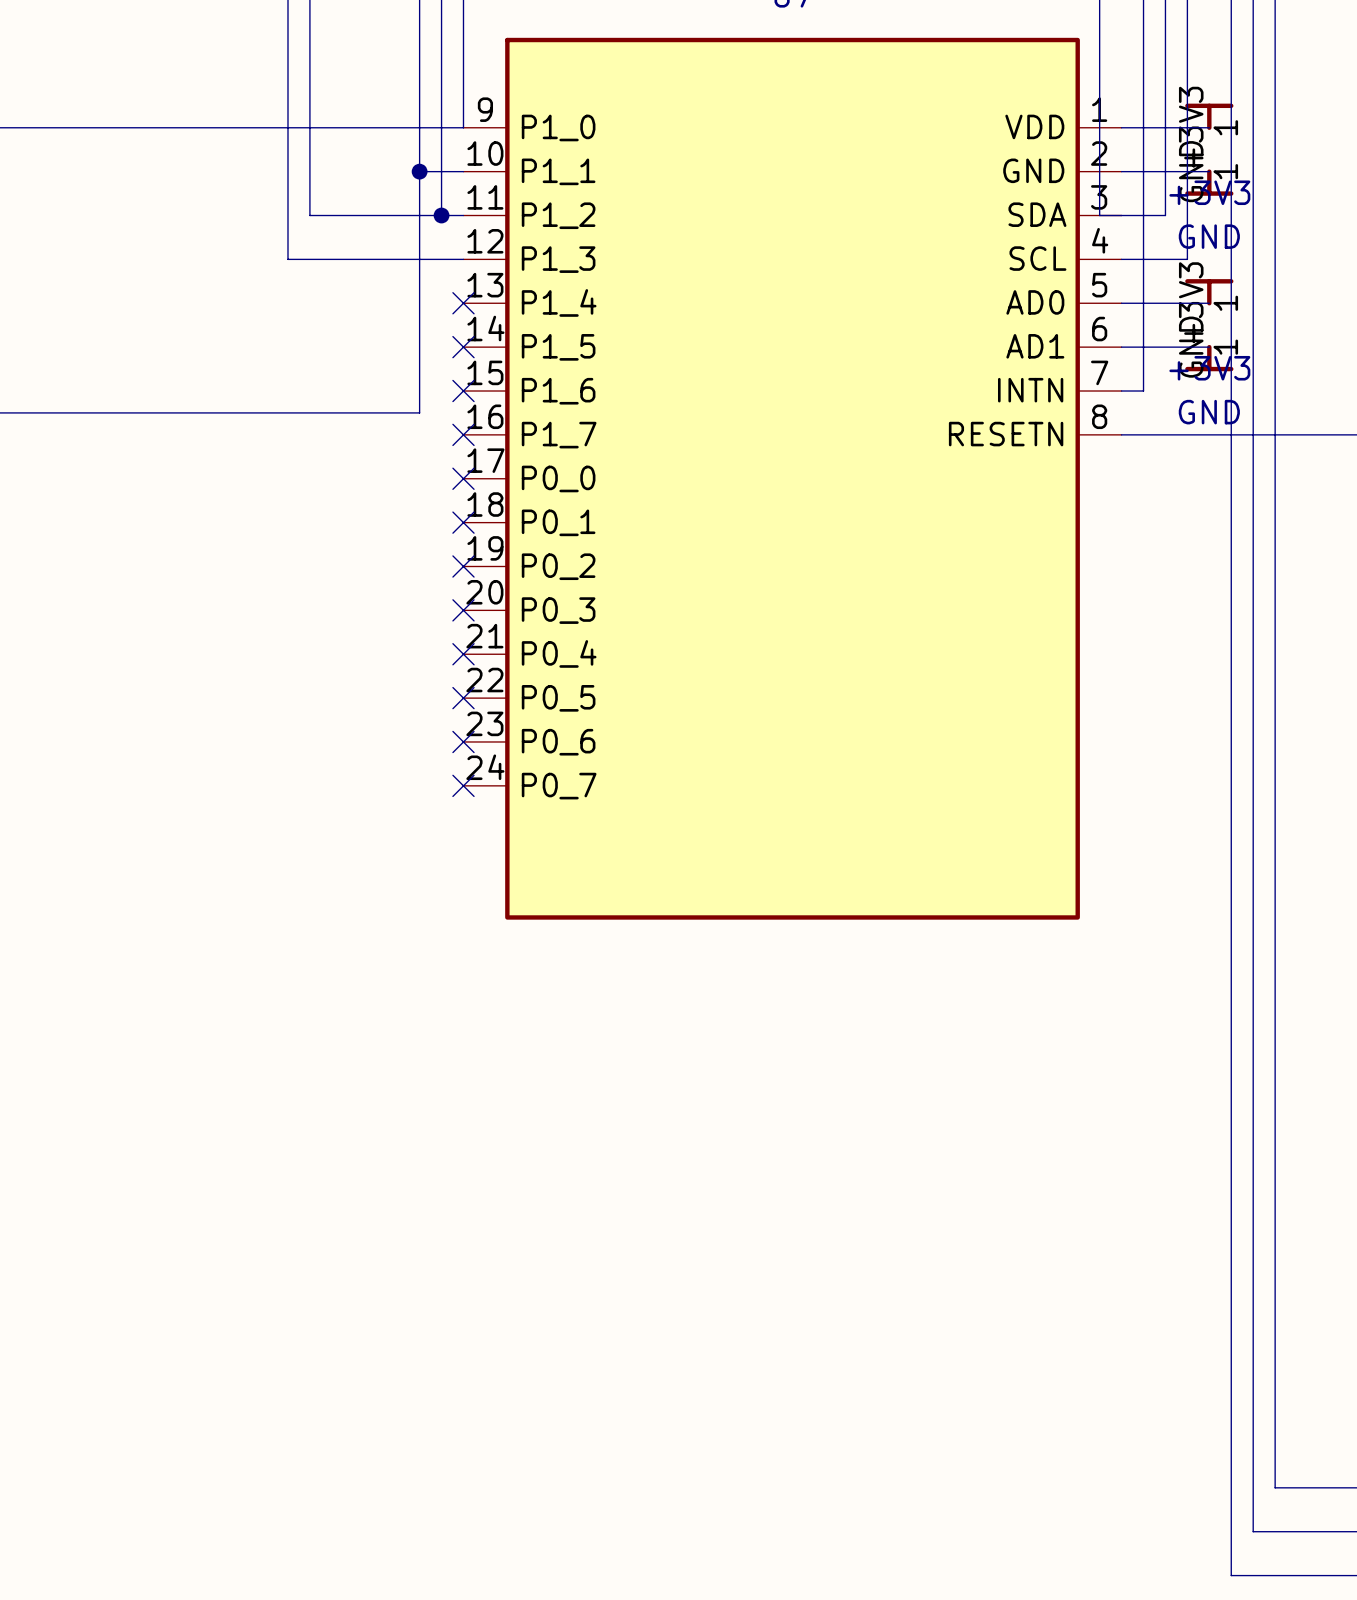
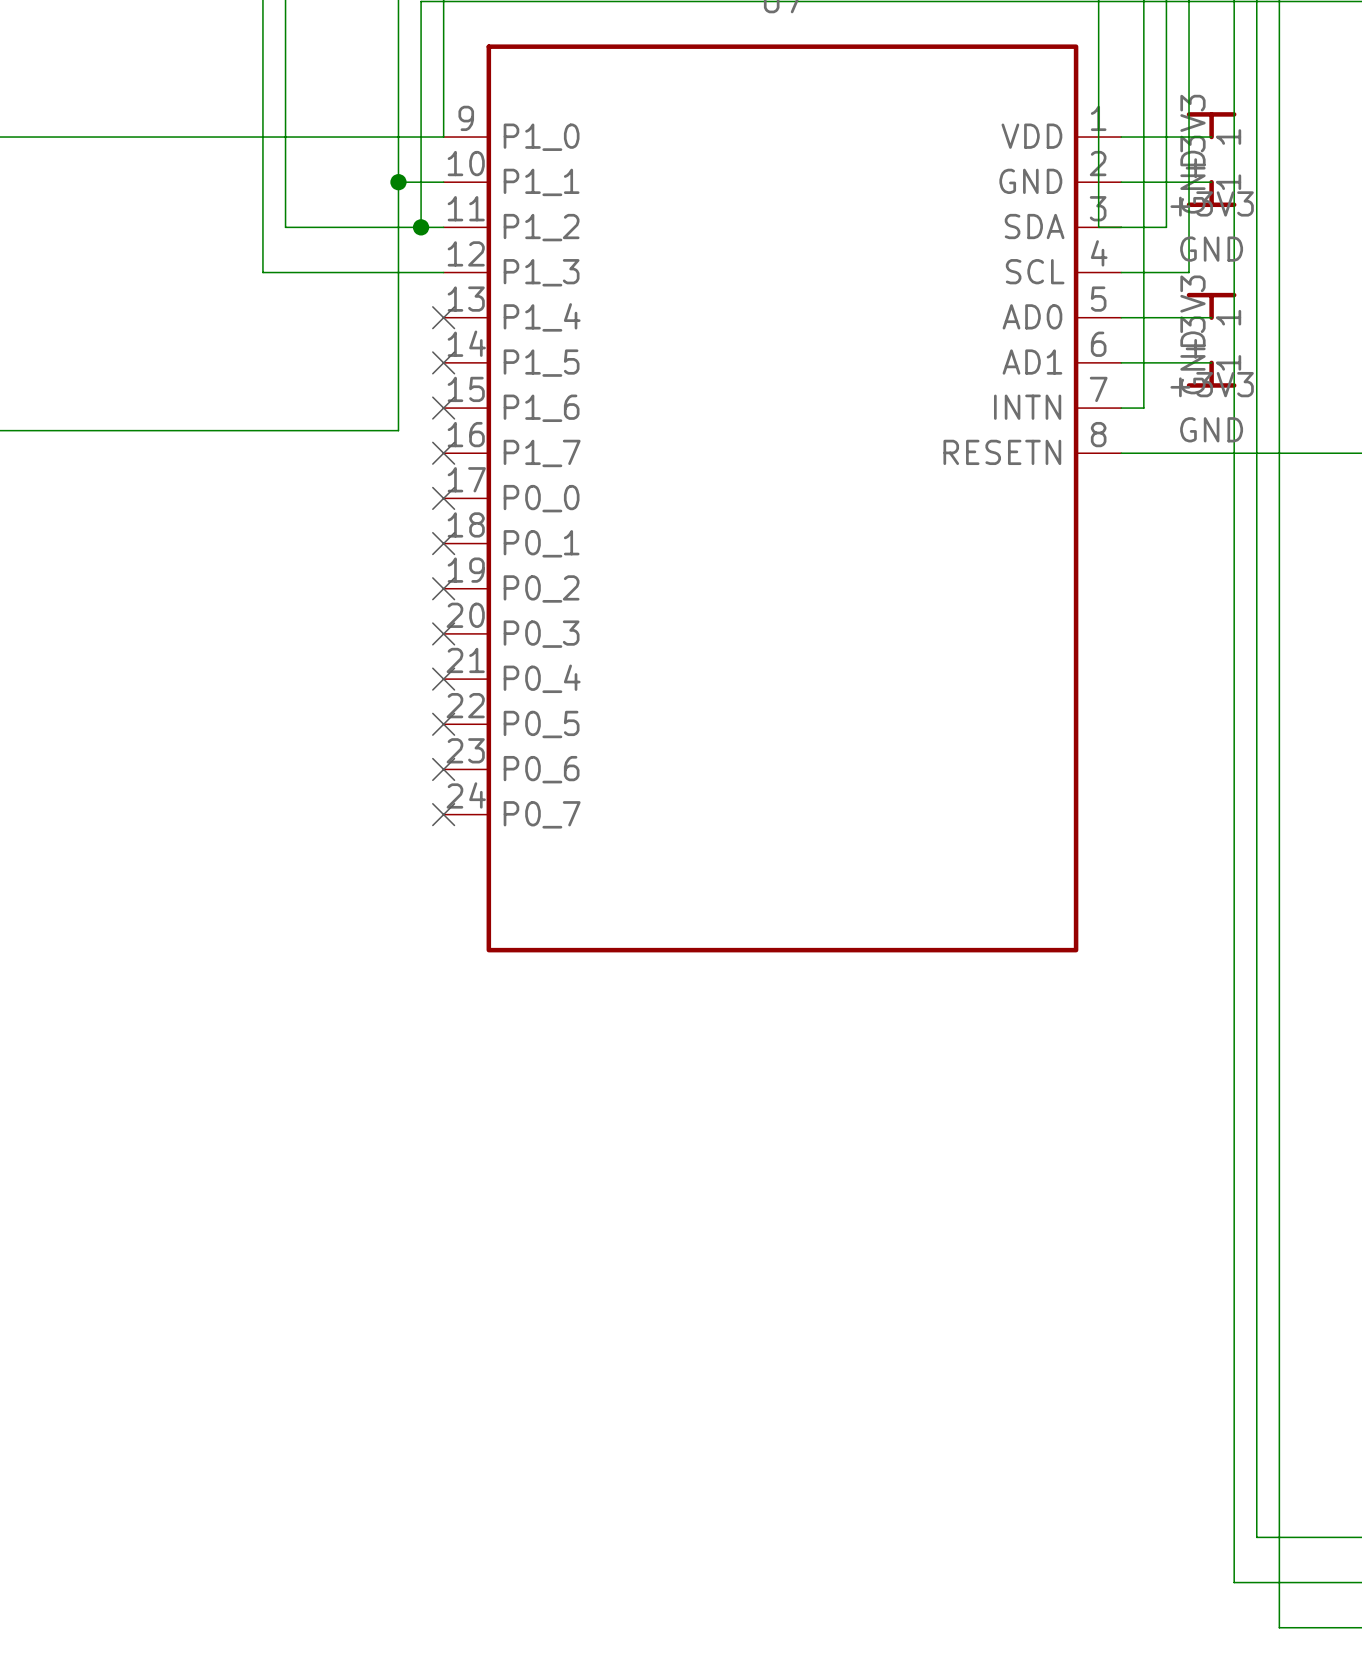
wire: (1253, 1487) (1253, 1531) -> (1234, 1582) (1256, 1582)
wire: (1231, 1531) (1231, 1575) (1275, 1575) -> (1256, 1537) (1279, 1537) (1279, 1627)

